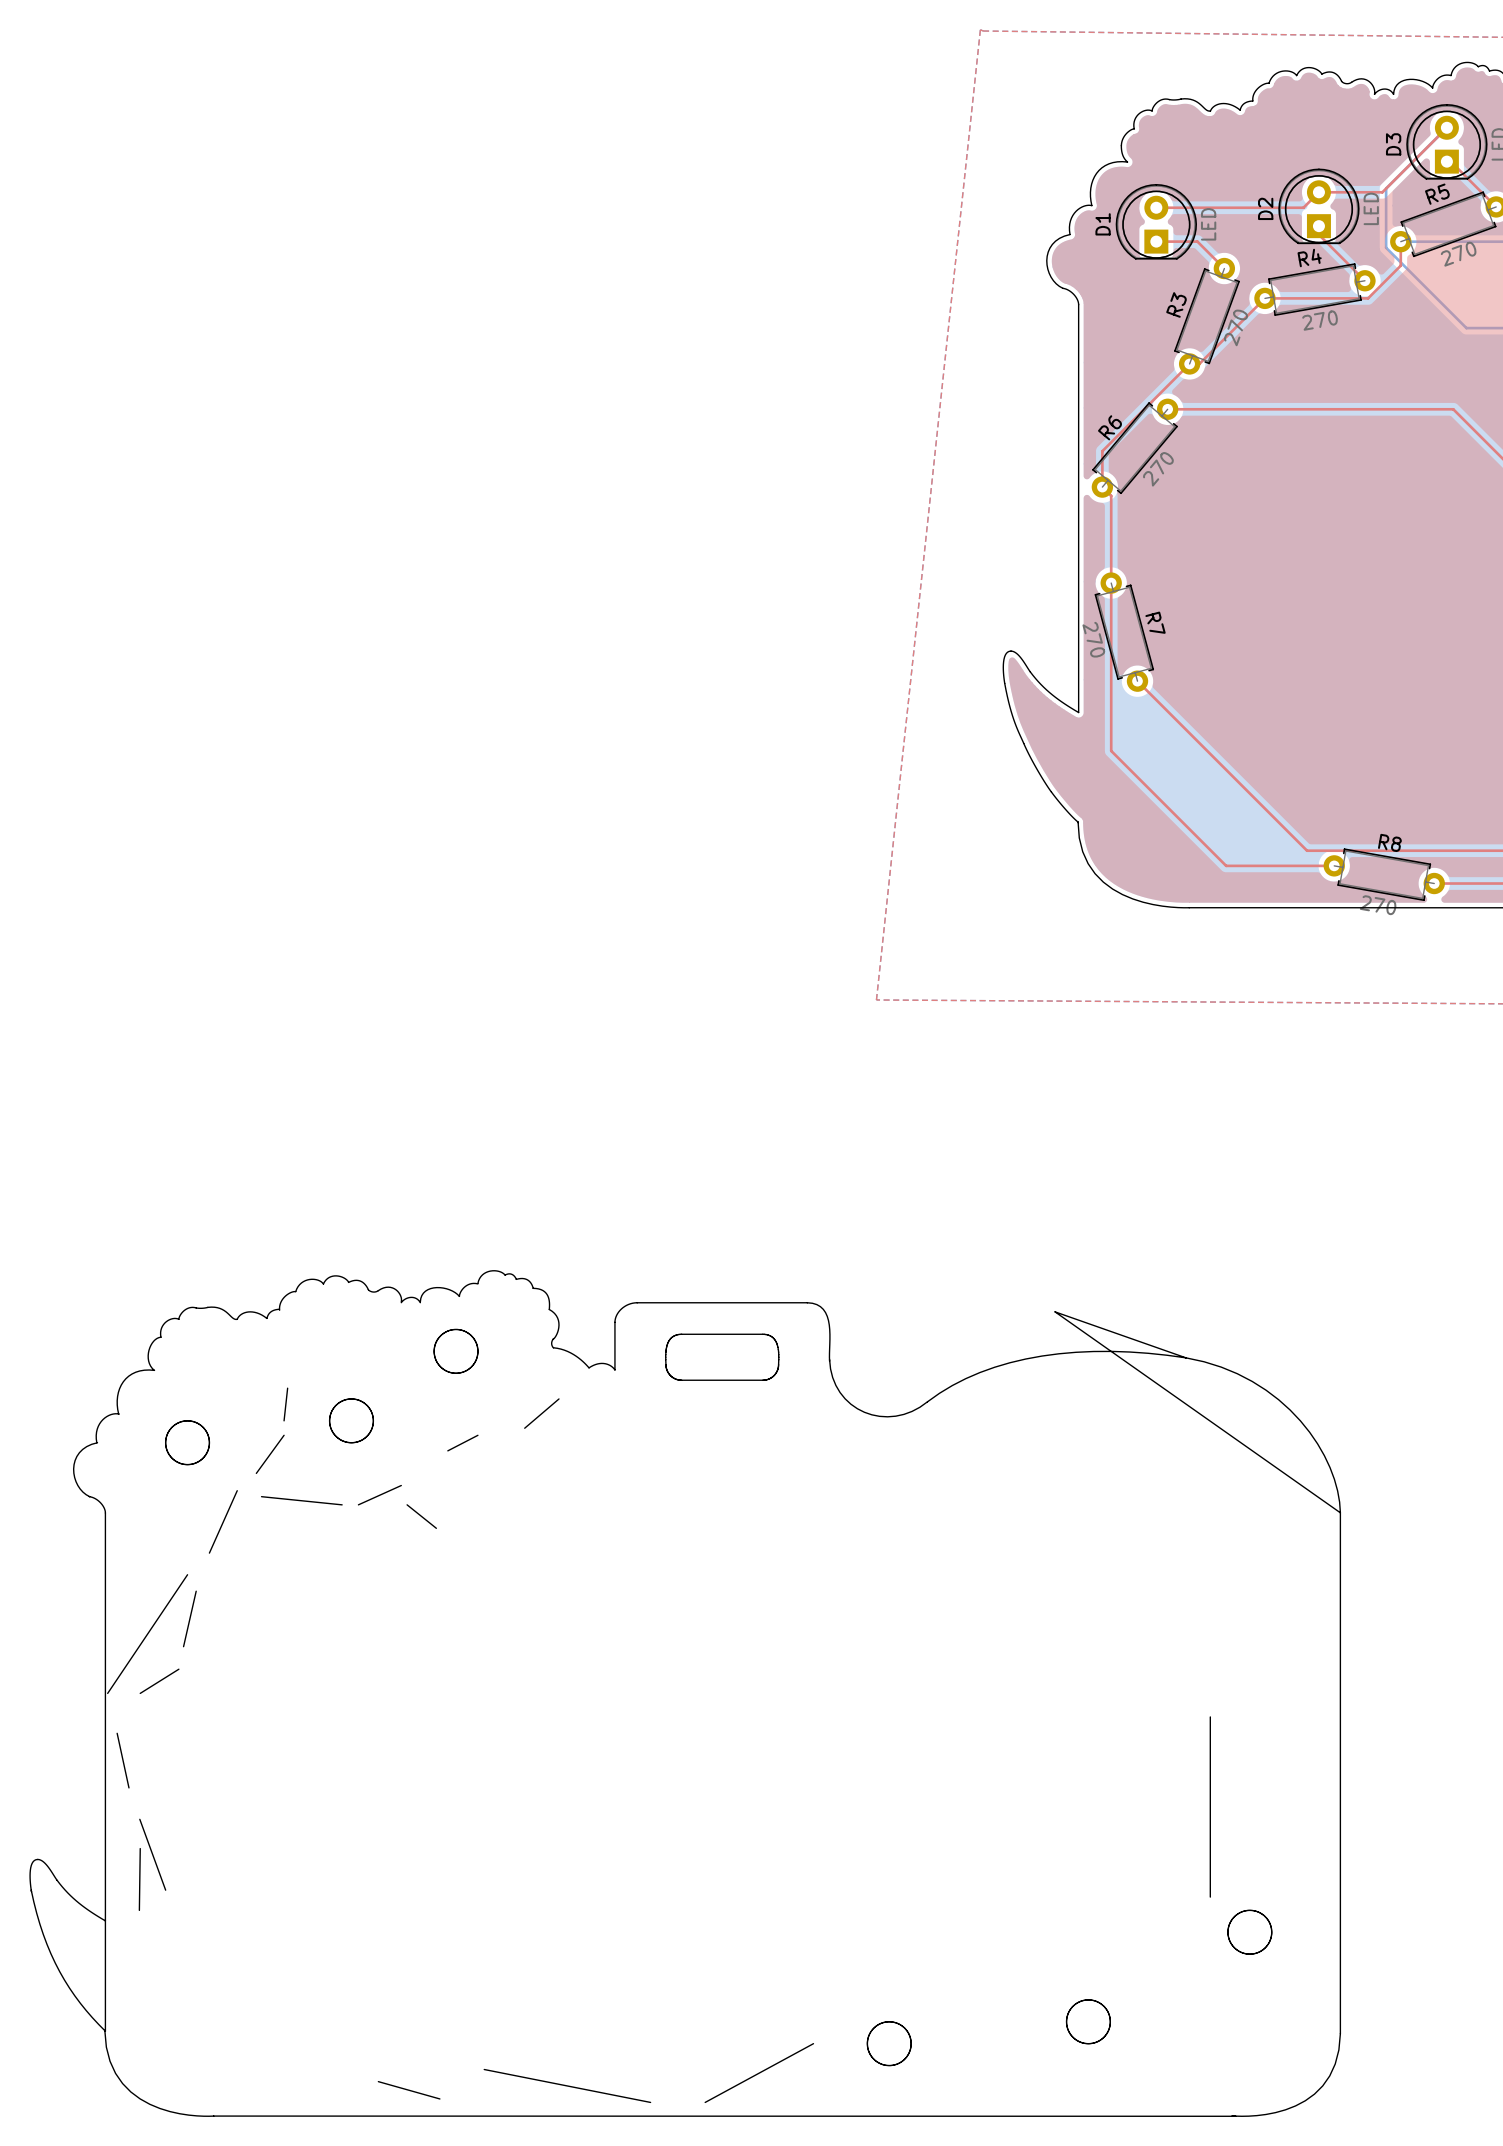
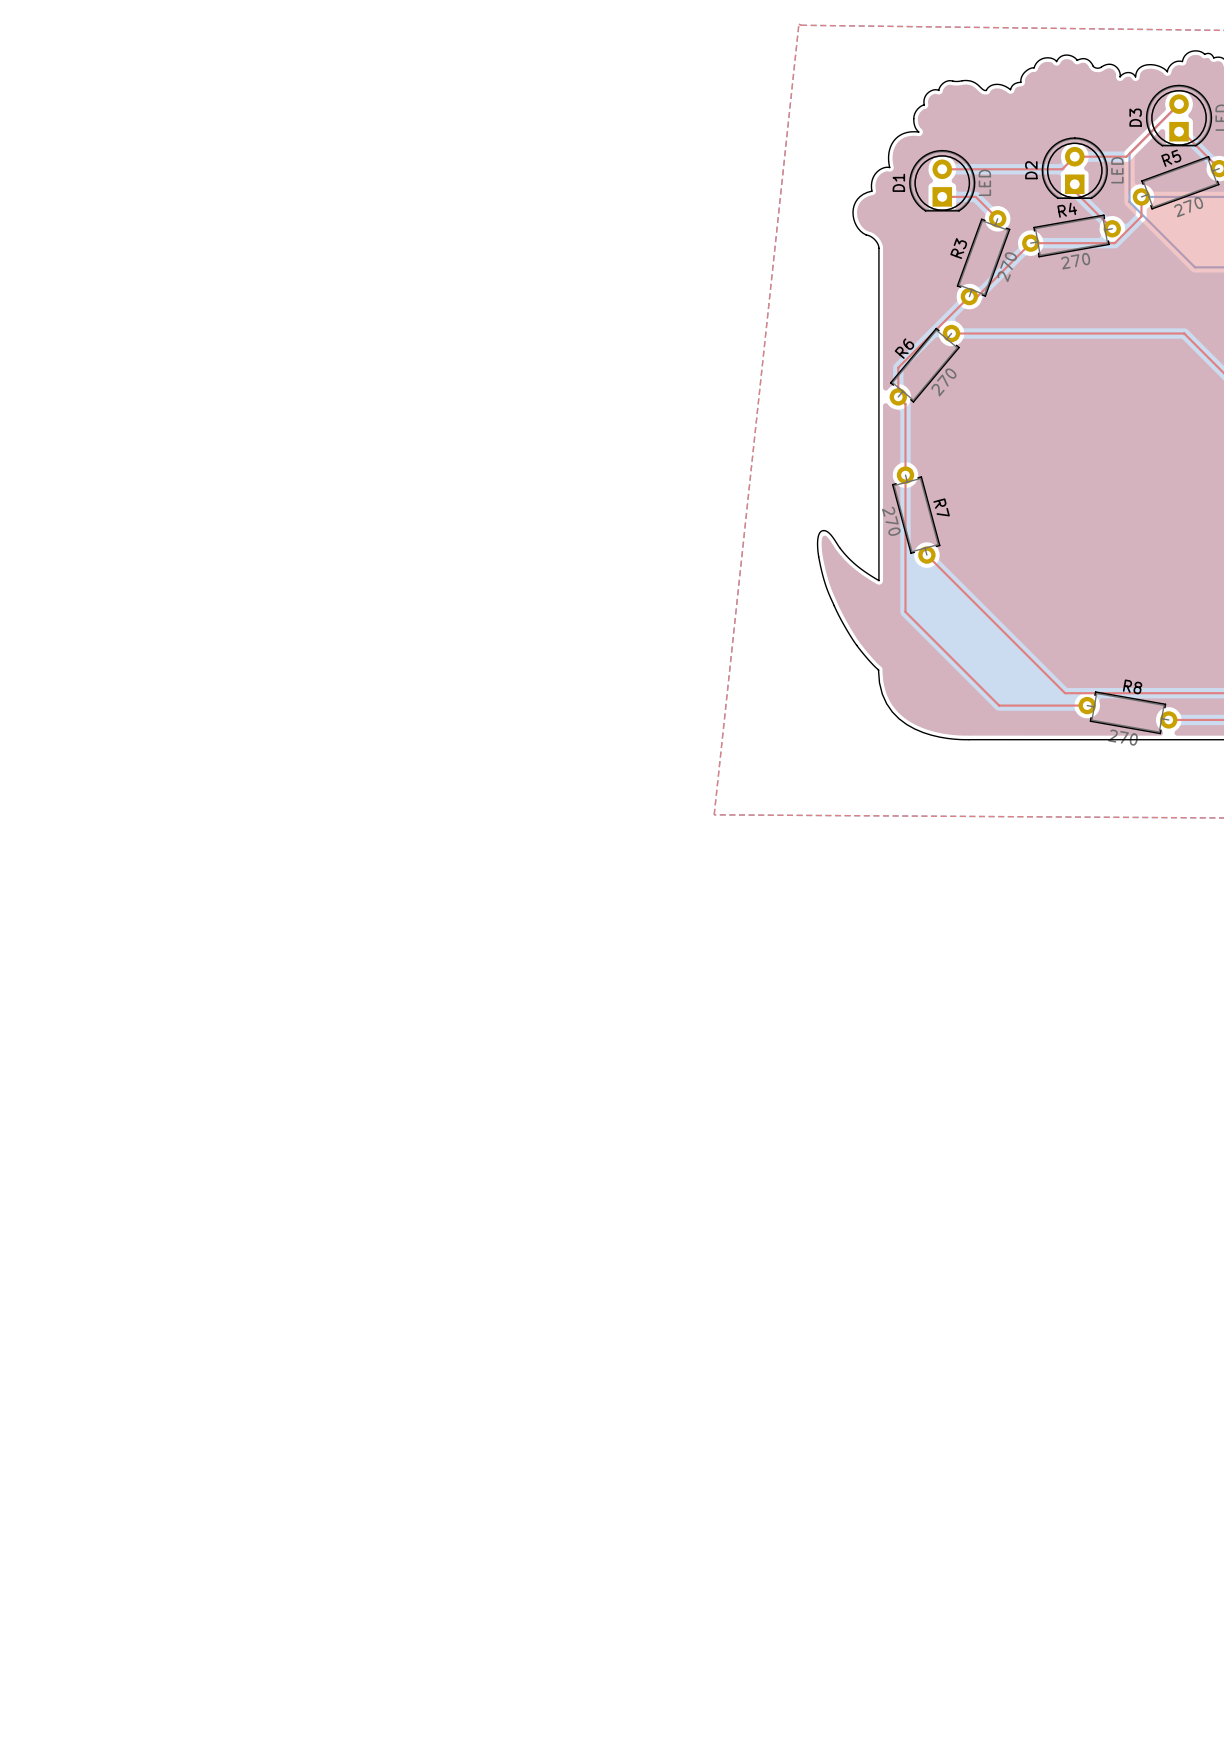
line: (516, 1279) (511, 1274) (505, 1275) (492, 1270) (482, 1274) (477, 1283) -> none
line: (516, 1279) (526, 1279) (533, 1288) (540, 1289) (546, 1294) (549, 1309) (556, 1315) (558, 1322) (557, 1331) (553, 1338) -> none
line: (348, 1281) (342, 1277) (334, 1275) (327, 1278) (323, 1283) -> none
line: (348, 1282) (361, 1281) (372, 1291) (386, 1287) (392, 1287) (399, 1294) (401, 1301) -> none
line: (477, 1283) (465, 1286) (459, 1296) (446, 1288) (430, 1288) (423, 1293) (420, 1301) -> none
line: (323, 1284) (316, 1279) (307, 1279) (299, 1284) (295, 1291) -> none
line: (295, 1291) (284, 1297) (280, 1303) (279, 1310) -> none
line: (401, 1302) (412, 1297) (420, 1302) -> none
line: (279, 1309) (270, 1311) (266, 1318) (259, 1313) (250, 1311) (242, 1313) (235, 1319) (217, 1307) (187, 1308) (181, 1313) (178, 1319) (171, 1319) (164, 1323) (160, 1330) (160, 1337) (155, 1339) (150, 1345) (148, 1358) (154, 1370) -> none
line: (454, 1329) (446, 1331) (439, 1336) (435, 1343) (434, 1352) (436, 1360) (441, 1367) (448, 1371) (457, 1373) (465, 1371) (472, 1366) (476, 1358) (477, 1350) (475, 1341) (470, 1335) (463, 1330) (454, 1329) -> none
line: (681, 1334) (671, 1338) (666, 1350) (666, 1369) (676, 1379) (764, 1380) (772, 1377) (777, 1369) (777, 1344) (774, 1338) (768, 1335) (681, 1334) -> none
line: (553, 1338) (551, 1343) (553, 1347) (570, 1352) (589, 1367) (603, 1363) (614, 1369) (615, 1318) (621, 1308) (630, 1303) (807, 1302) (820, 1306) (827, 1316) (829, 1329) (829, 1361) -> none
line: (1185, 1357) (1055, 1311) (1340, 1512) -> none
line: (1185, 1357) (1129, 1352) (1093, 1351) (1058, 1353) (1025, 1359) (979, 1372) (952, 1385) (912, 1411) (887, 1416) (864, 1412) (845, 1398) (832, 1377) (829, 1359) -> none
line: (1185, 1357) (1204, 1361) (1237, 1373) (1266, 1390) (1290, 1410) (1309, 1432) (1324, 1455) (1334, 1479) (1340, 1512) -> none
line: (154, 1370) (135, 1372) (123, 1381) (117, 1396) (118, 1413) -> none
line: (287, 1388) (284, 1420) -> none
line: (351, 1398) (342, 1400) (336, 1405) (331, 1412) (329, 1420) (331, 1429) (336, 1436) (342, 1441) (351, 1442) (360, 1441) (366, 1436) (371, 1429) (373, 1420) (371, 1412) (366, 1405) (360, 1400) (351, 1398) -> none
line: (558, 1398) (524, 1428) -> none
line: (119, 1414) (109, 1415) (101, 1421) (96, 1432) (96, 1442) -> none
line: (185, 1420) (177, 1423) (170, 1428) (166, 1436) (165, 1444) (168, 1453) (173, 1459) (181, 1463) (189, 1464) (197, 1461) (204, 1456) (208, 1449) (209, 1440) (206, 1432) (201, 1425) (194, 1421) (185, 1420) -> none
line: (284, 1435) (256, 1473) -> none
line: (477, 1435) (447, 1450) -> none
line: (97, 1442) (82, 1449) (76, 1456) (74, 1464) (73, 1473) (77, 1485) (89, 1496) -> none
line: (401, 1485) (358, 1504) -> none
line: (237, 1490) (209, 1553) -> none
line: (89, 1496) (100, 1502) (105, 1513) (105, 2031) -> none
line: (261, 1496) (342, 1504) -> none
line: (407, 1504) (436, 1528) -> none
line: (1340, 1512) (1338, 2049) (1329, 2075) (1322, 2085) (1305, 2100) (1275, 2112) (1256, 2115) (1232, 2115) -> none
line: (187, 1574) (107, 1693) -> none
line: (196, 1591) (183, 1646) -> none
line: (178, 1669) (140, 1693) -> none
line: (1210, 1716) (1210, 1897) -> none
line: (117, 1733) (128, 1787) -> none
line: (139, 1819) (165, 1890) -> none
line: (140, 1848) (139, 1910) -> none
line: (31, 1890) (43, 1934) (59, 1971) (80, 2003) (105, 2031) -> none
line: (31, 1891) (30, 1867) (34, 1860) (39, 1859) (46, 1864) (73, 1898) (105, 1920) -> none
line: (1249, 1910) (1241, 1912) (1234, 1916) (1229, 1923) (1227, 1932) (1229, 1940) (1234, 1947) (1241, 1952) (1249, 1954) (1258, 1952) (1265, 1947) (1270, 1940) (1271, 1932) (1270, 1923) (1265, 1916) (1258, 1912) (1249, 1910) -> none
line: (1087, 1999) (1078, 2002) (1072, 2007) (1067, 2014) (1066, 2022) (1068, 2031) (1073, 2037) (1080, 2042) (1089, 2043) (1097, 2041) (1104, 2036) (1109, 2029) (1110, 2020) (1108, 2012) (1103, 2005) (1095, 2001) (1087, 1999) -> none
line: (889, 2021) (880, 2023) (873, 2028) (869, 2035) (867, 2043) (869, 2052) (873, 2059) (880, 2063) (889, 2065) (897, 2063) (904, 2059) (909, 2052) (911, 2043) (909, 2035) (904, 2028) (897, 2023) (889, 2021) -> none
line: (105, 2031) (110, 2061) (115, 2073) (130, 2092) (159, 2108) (196, 2115) (1235, 2116) -> none
line: (813, 2043) (705, 2102) -> none
line: (484, 2069) (650, 2102) -> none
line: (378, 2081) (439, 2098) -> none

